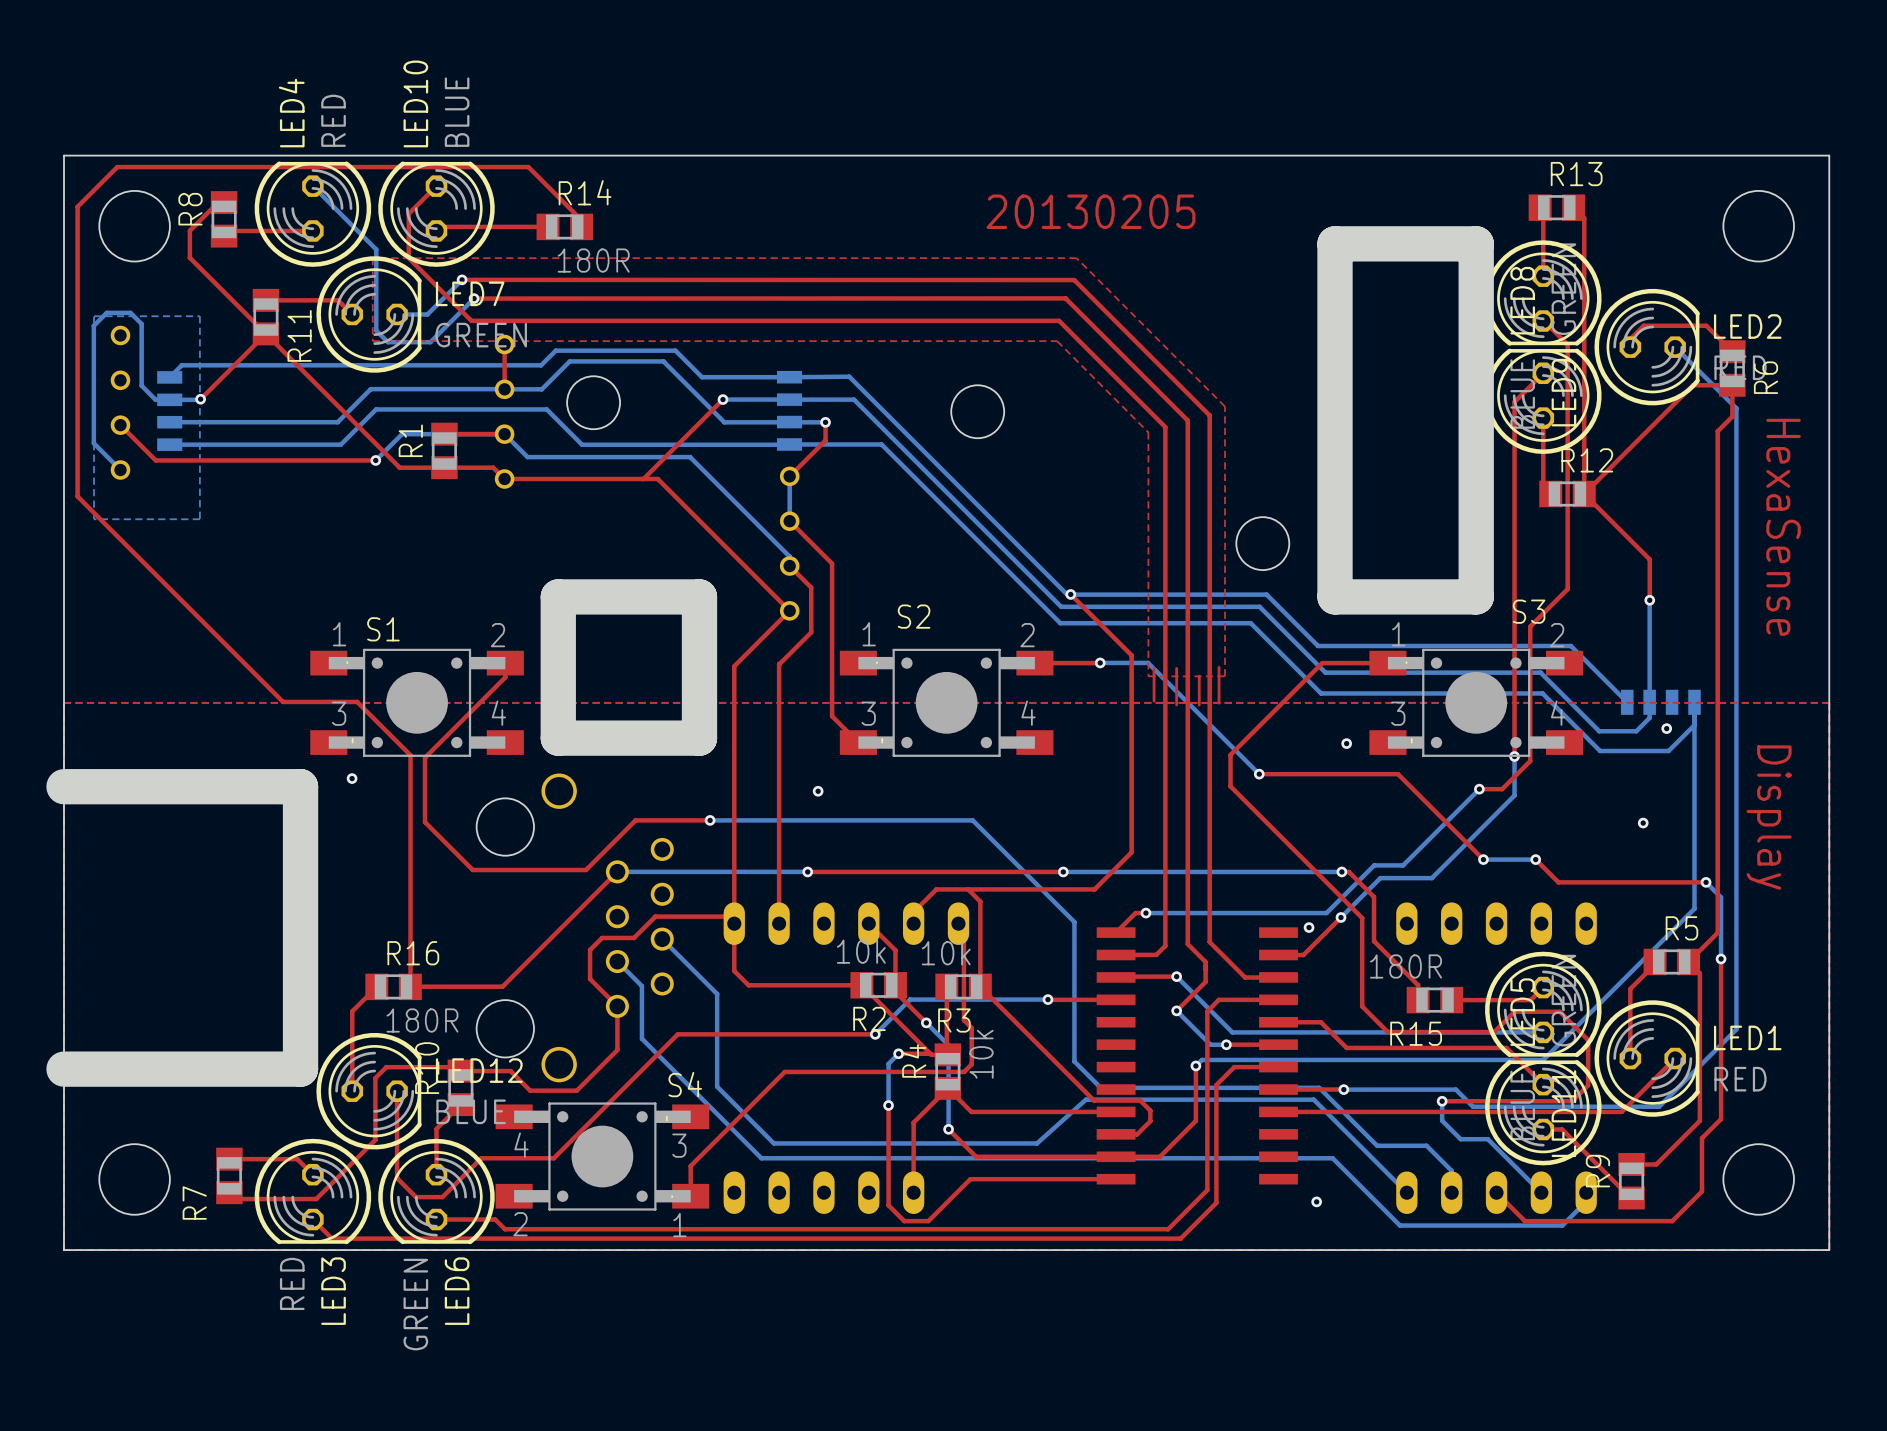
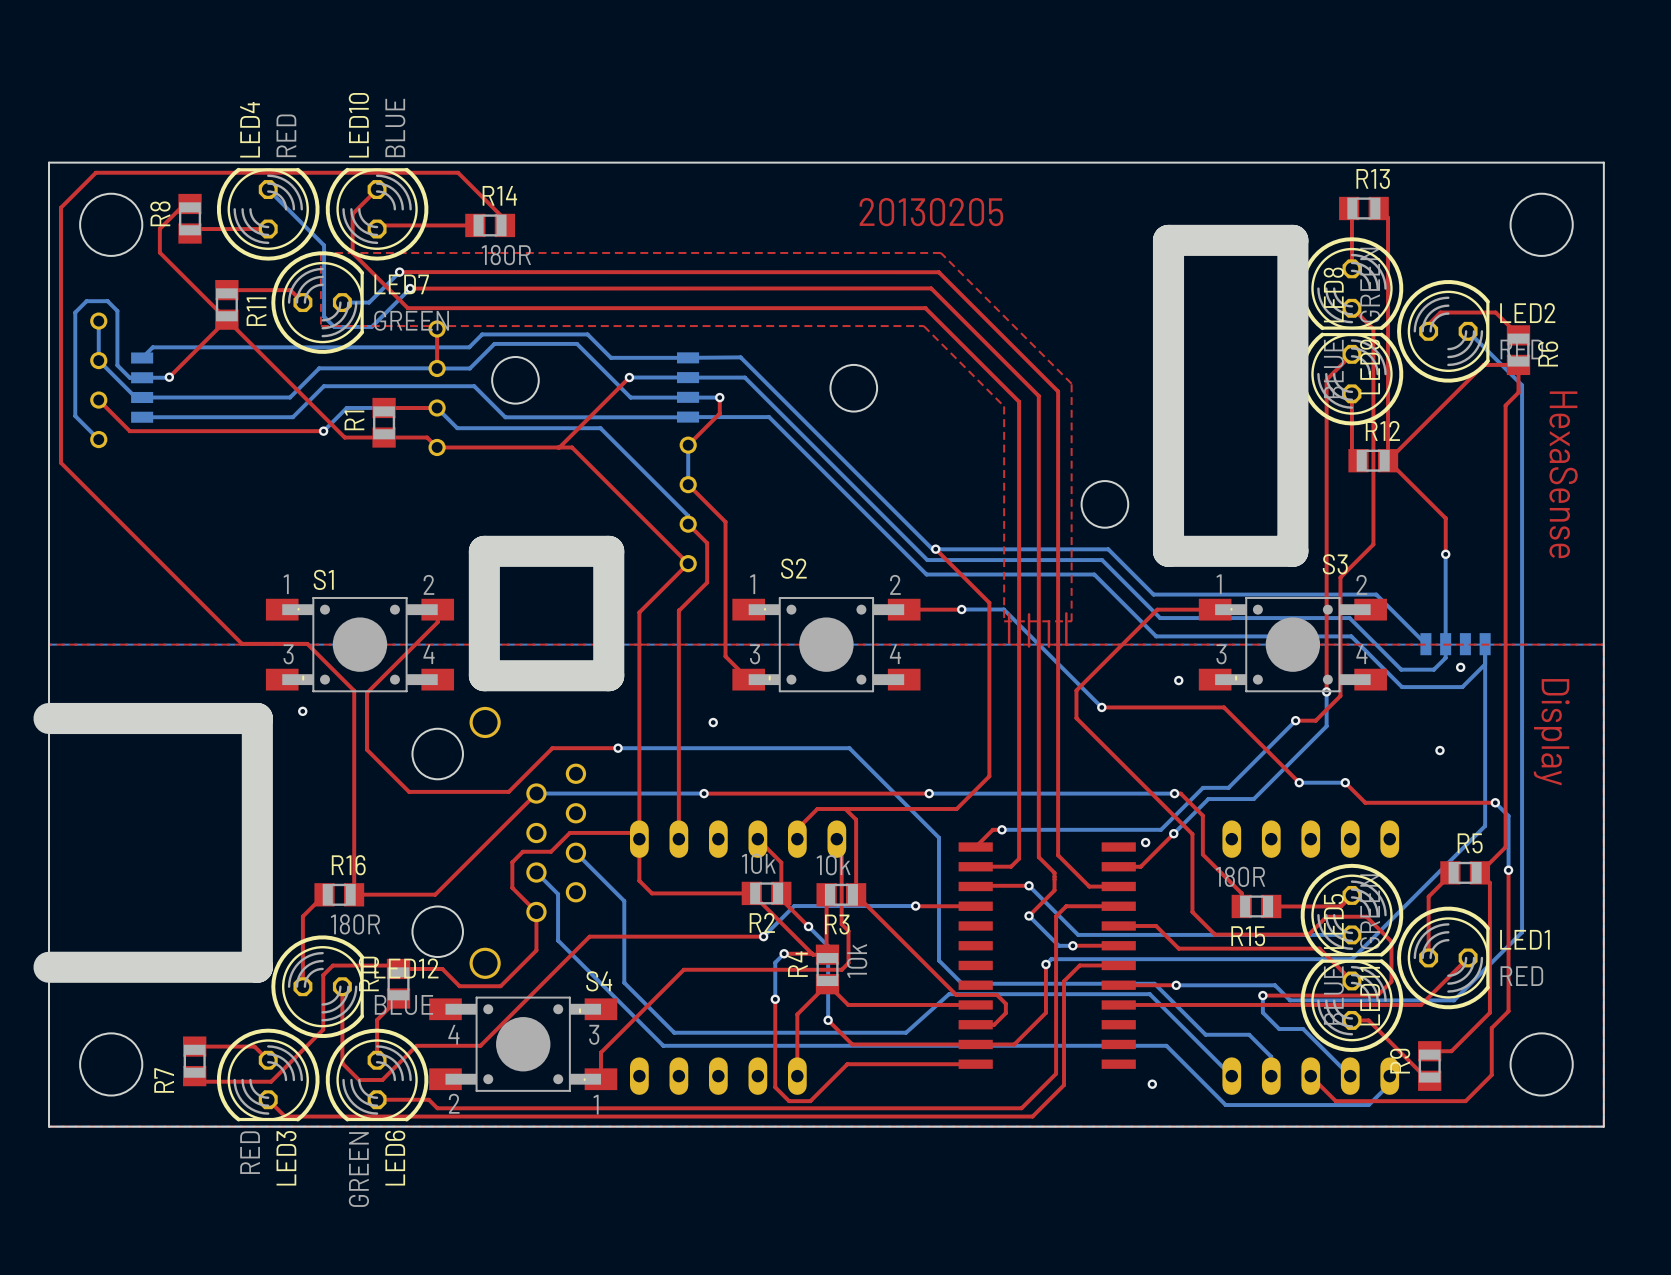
bottom zone outline: (94, 316) (94, 519) (199, 519) (199, 316) (94, 316) -> none
bottom track: none -> (98, 321) (98, 360) (135, 397) (142, 397)

